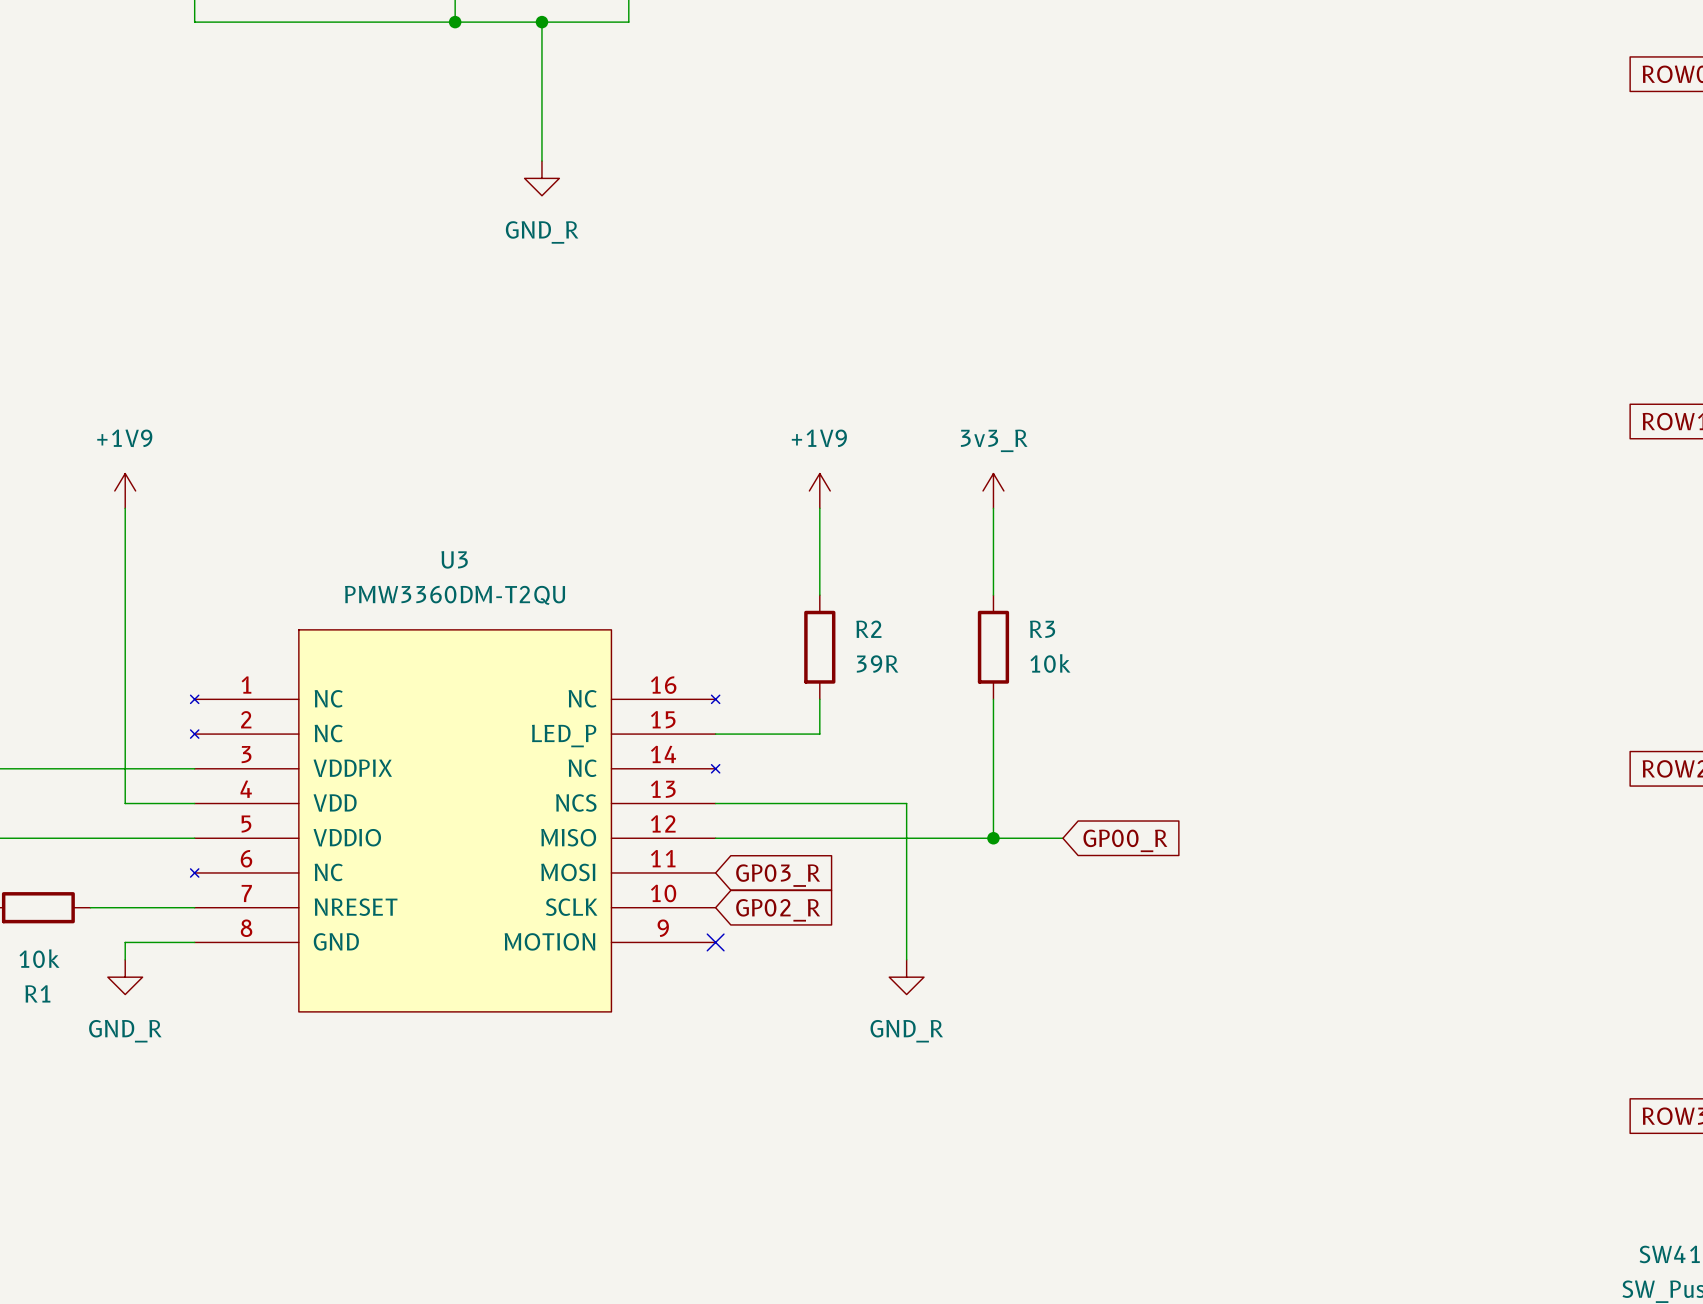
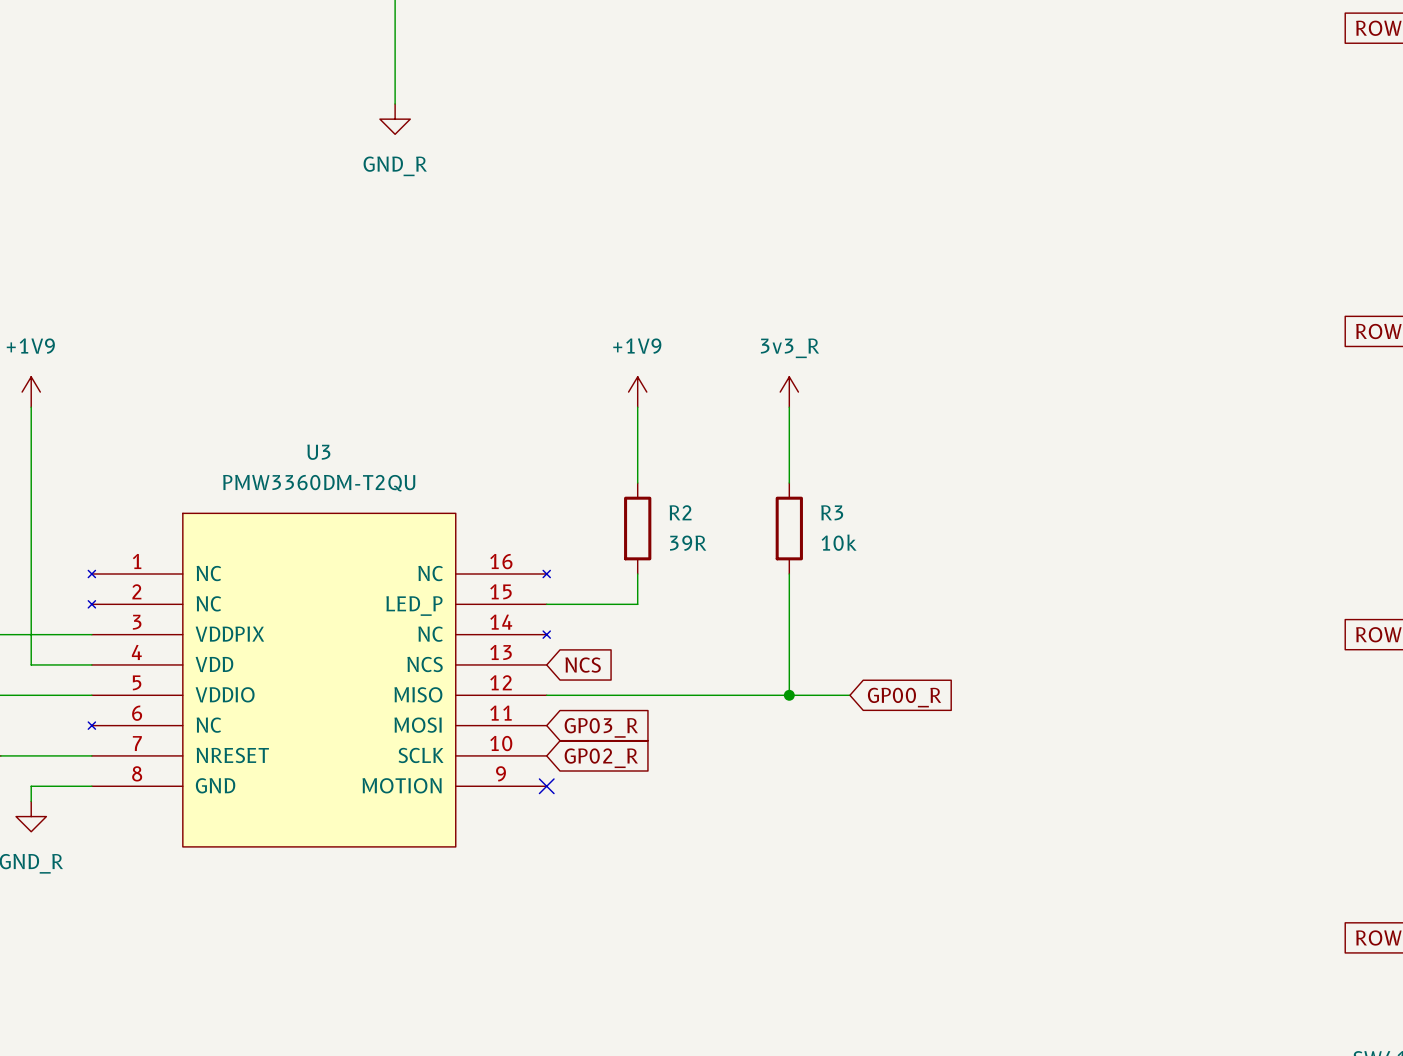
wire: (715, 803) (906, 803) (906, 959) -> none
global label: none -> NCS (583, 665)
power symbol: GND_R (906, 977) -> none

